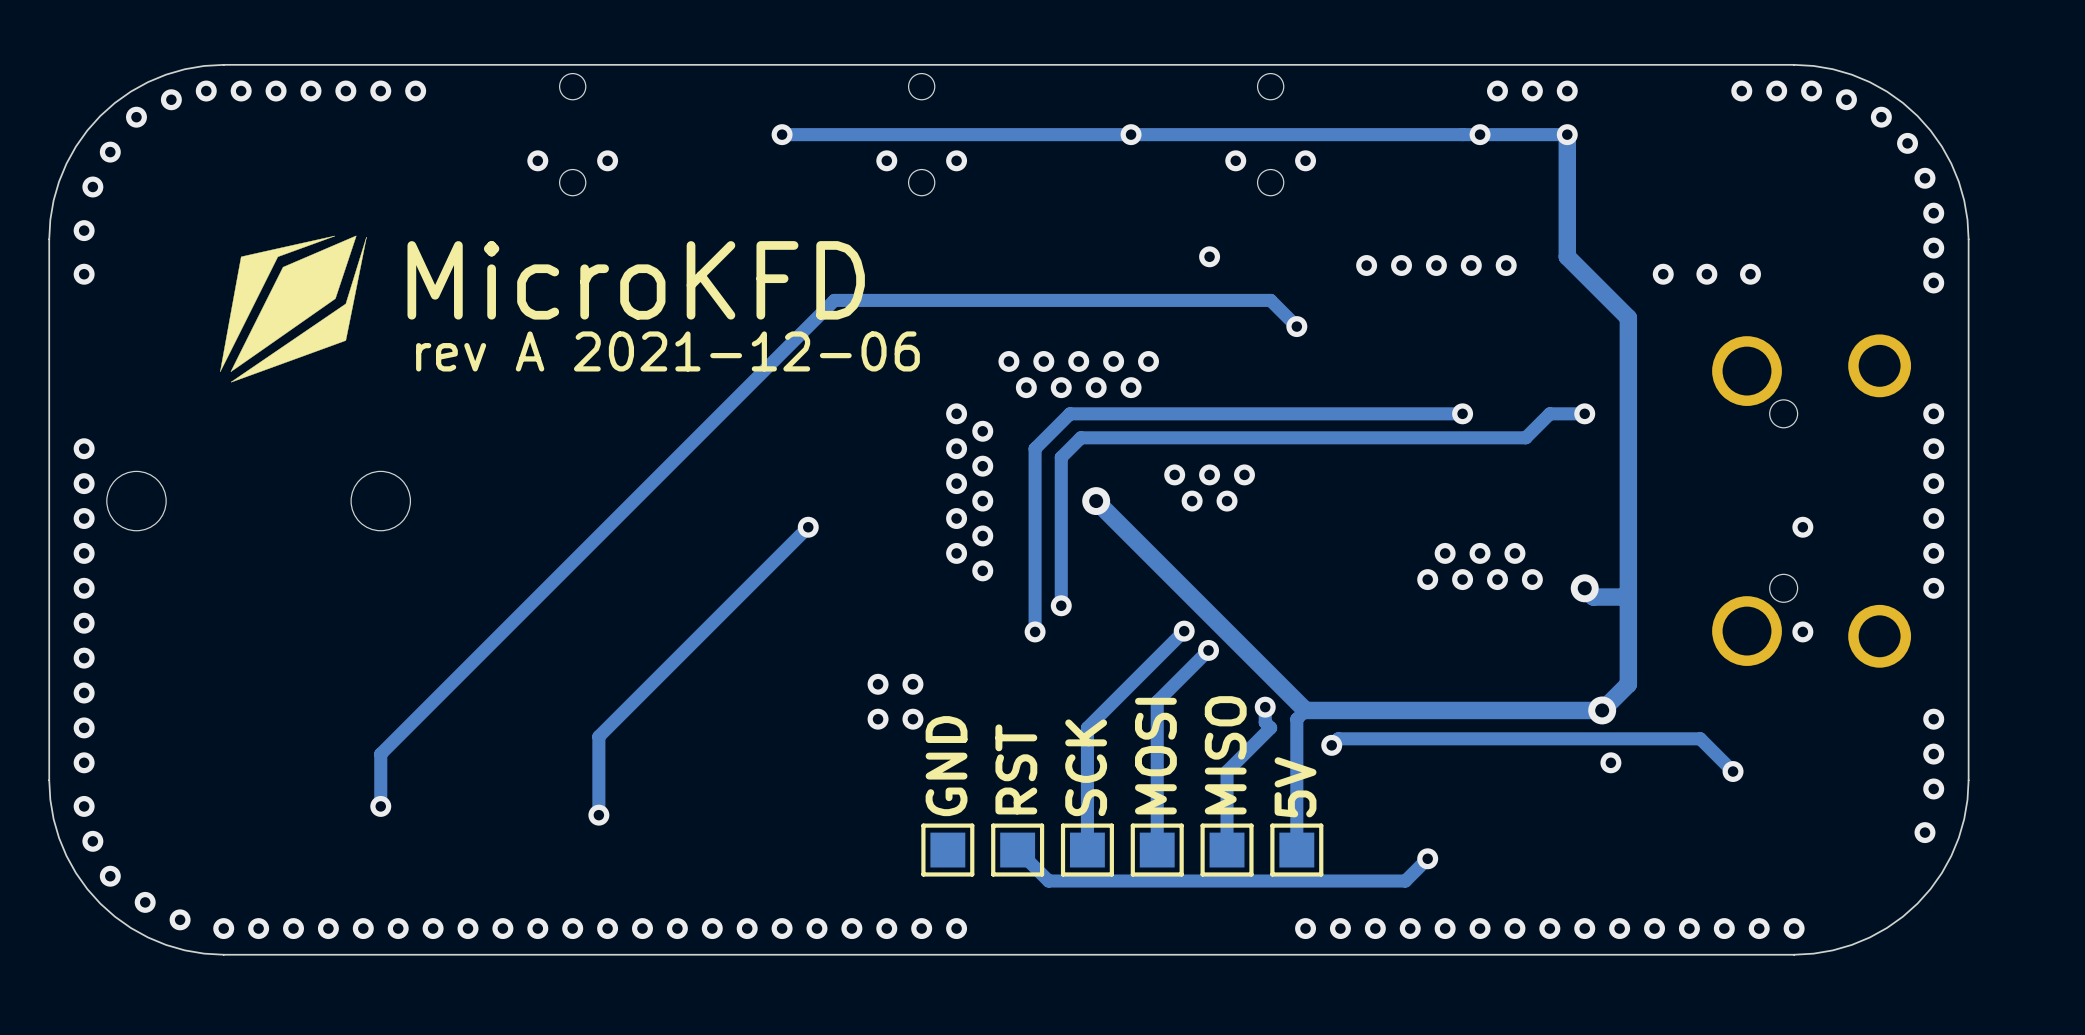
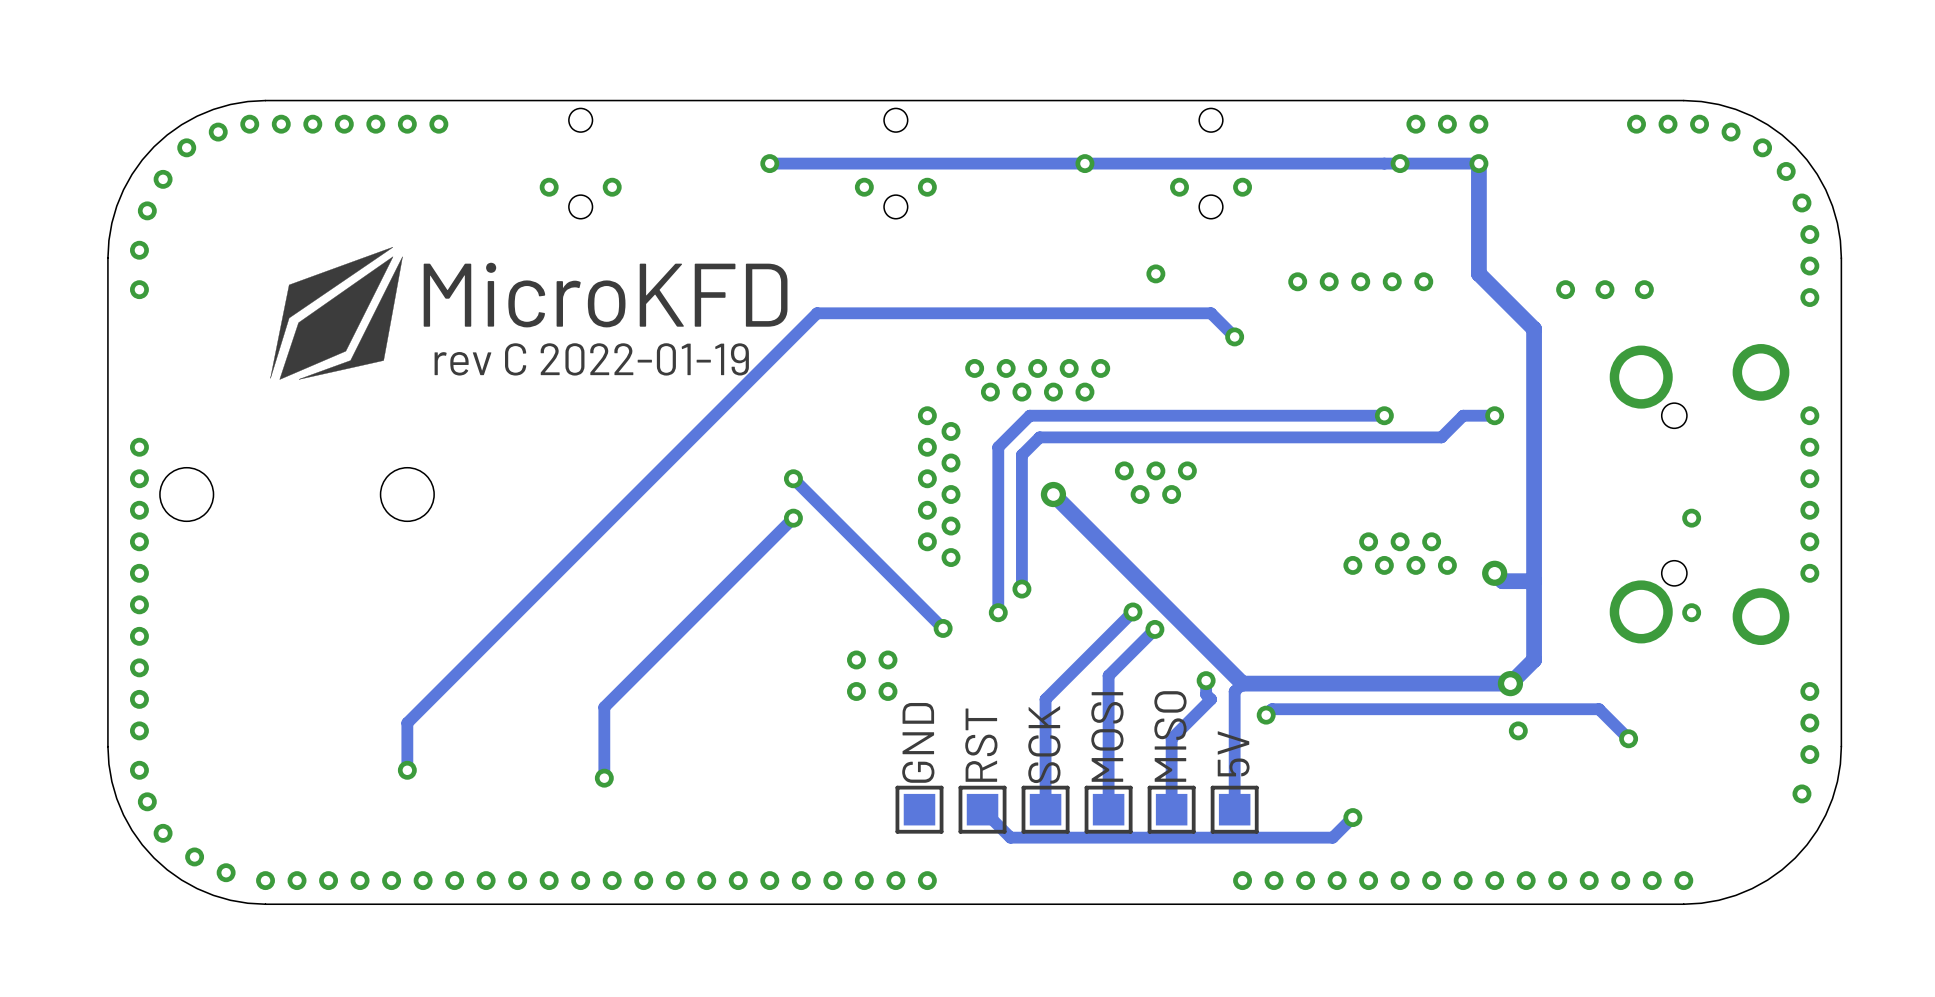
drawing shape: [220, 235, 367, 383] -> [270, 247, 403, 380]
text: rev A 2021-12-06 (667, 351) -> rev C 2022-01-19 (591, 359)
track: none -> (793, 478) (943, 628)
via: none -> (793, 478)
via: none -> (943, 628)

